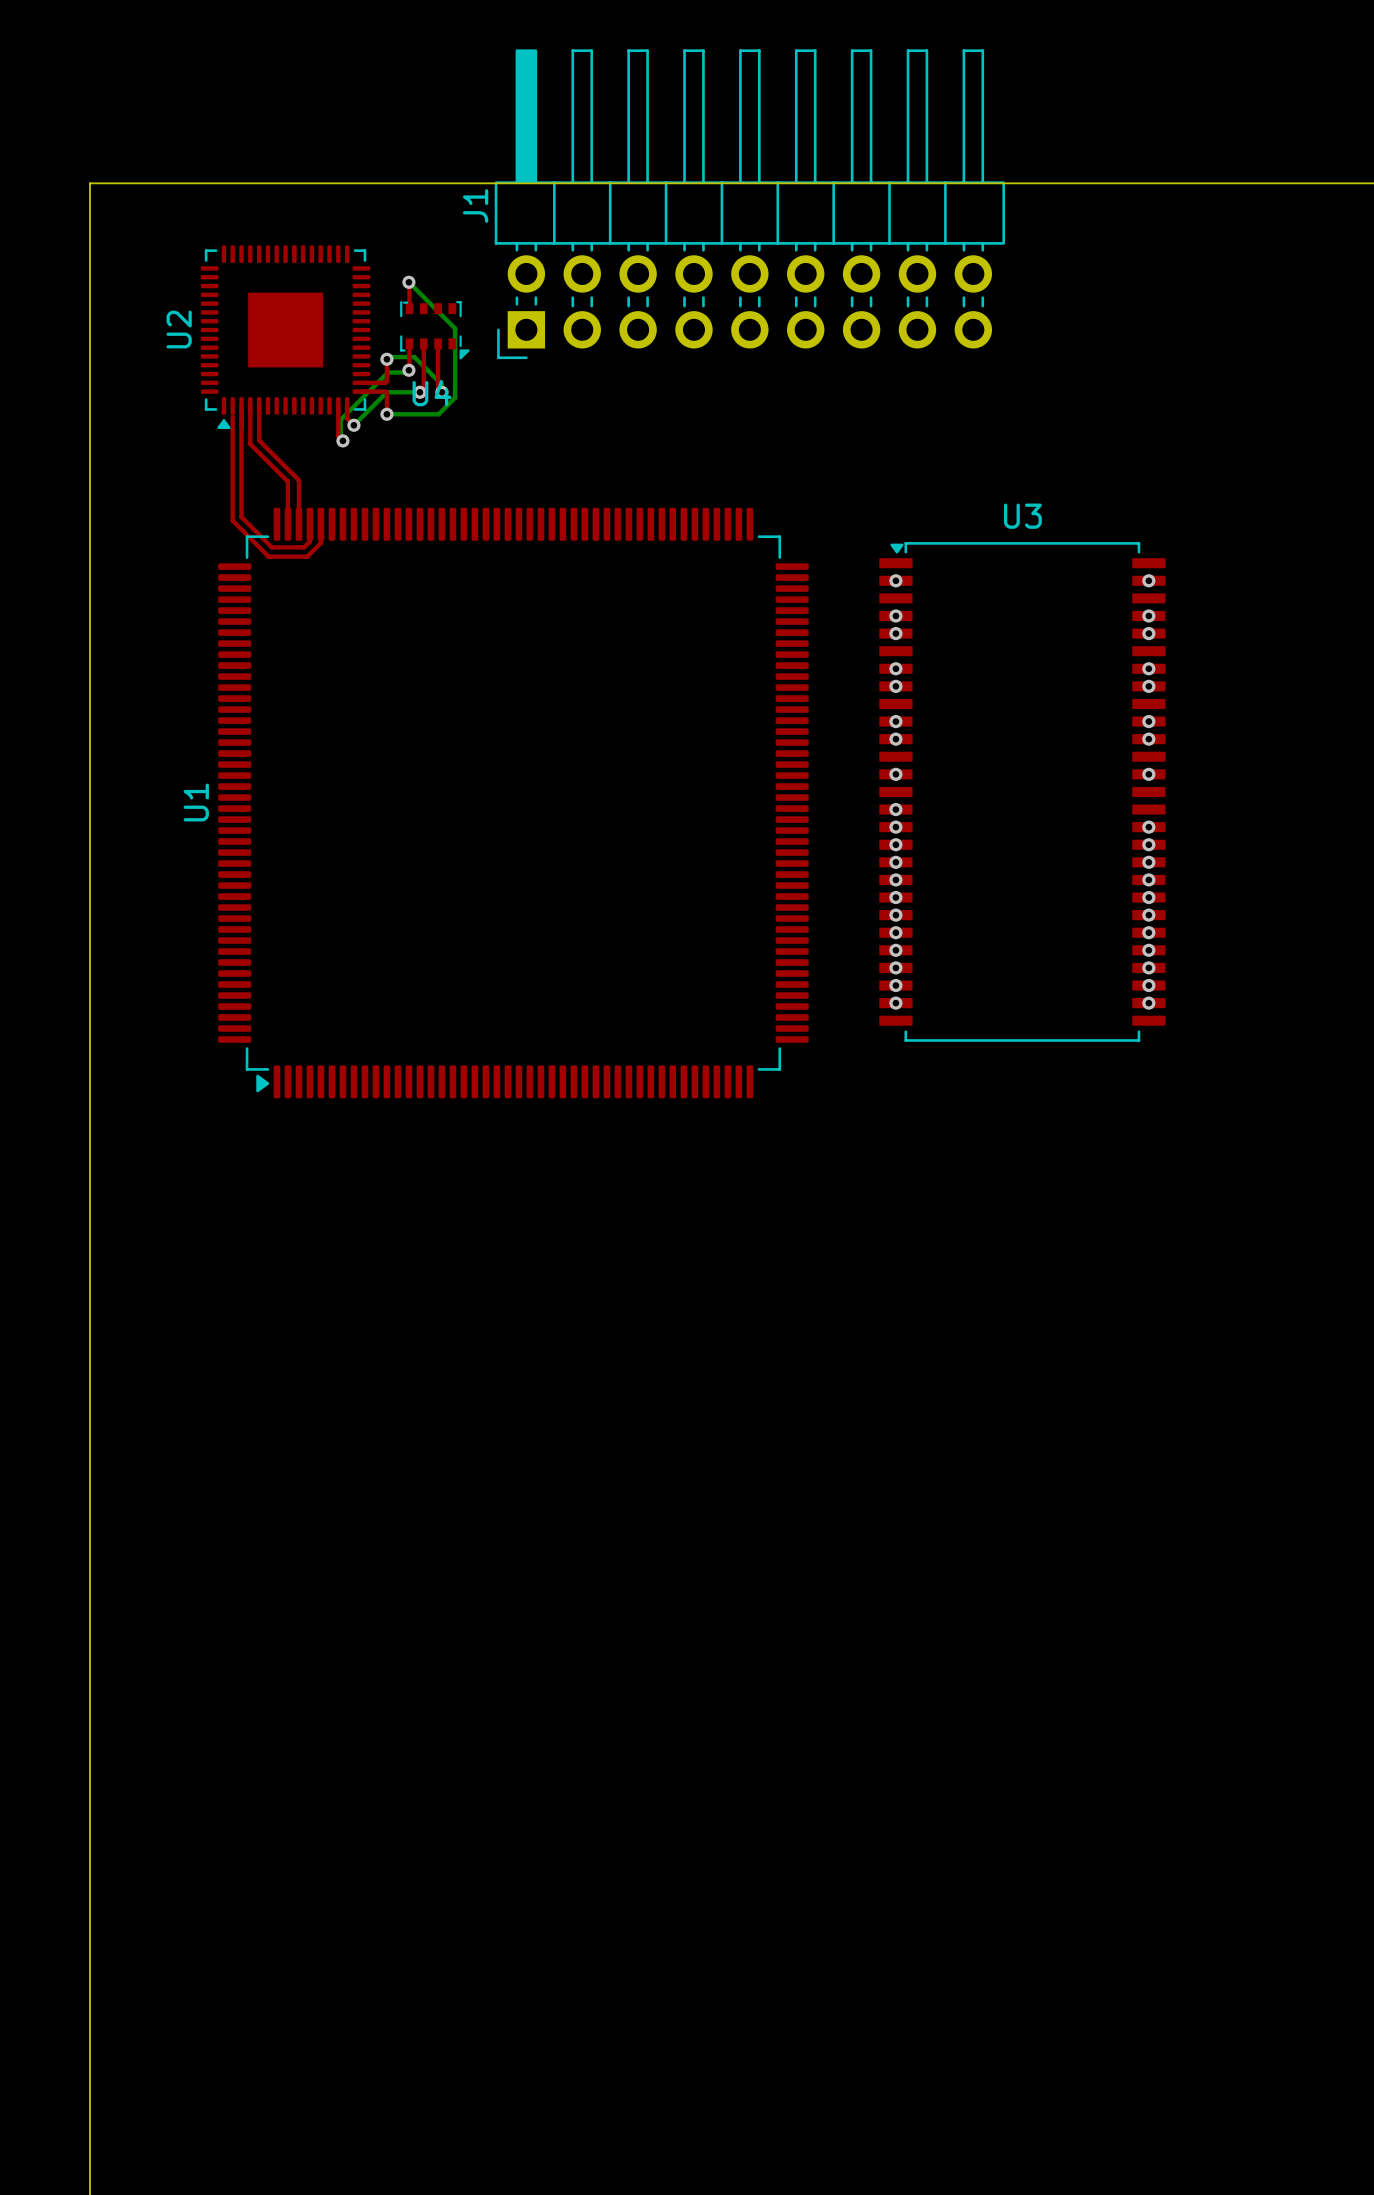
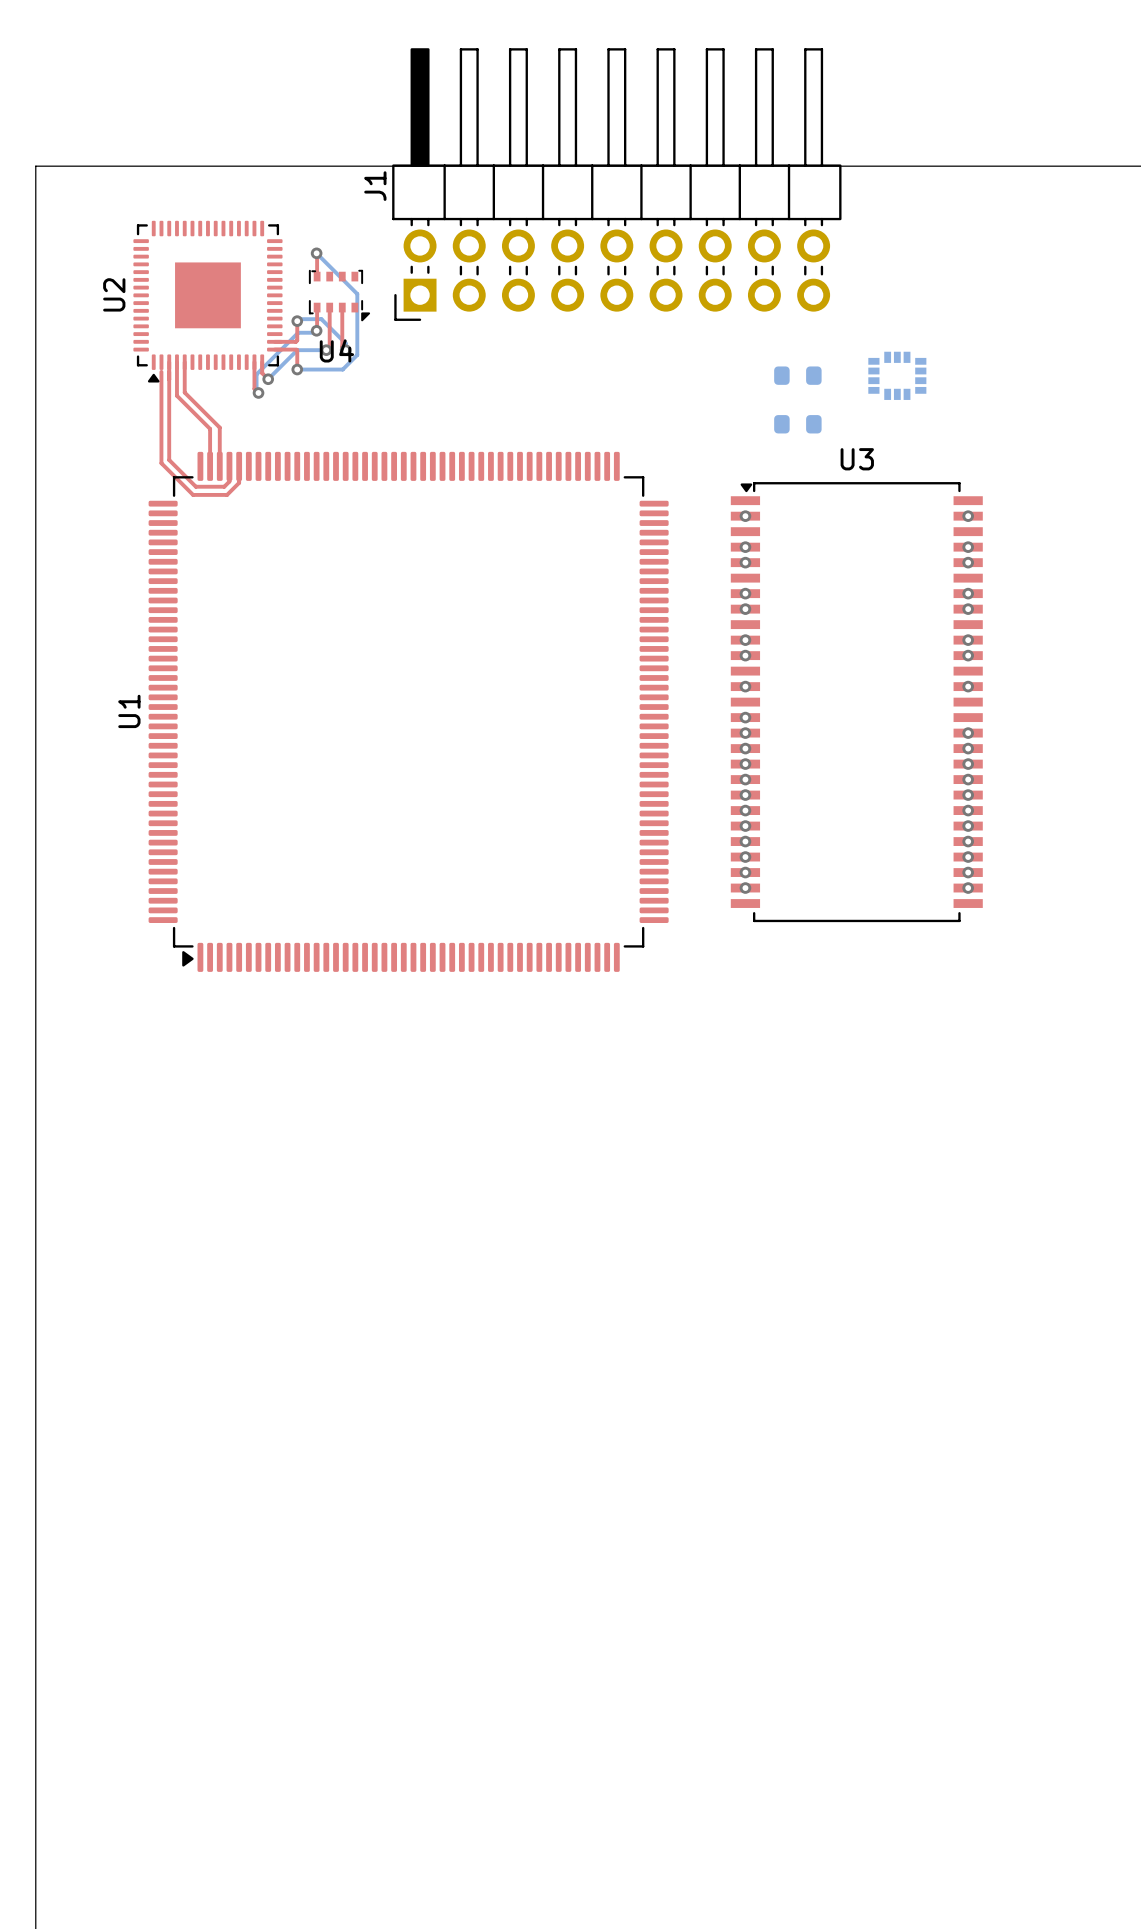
part: none -> (797, 375)
part: none -> (897, 375)
part: none -> (797, 424)

